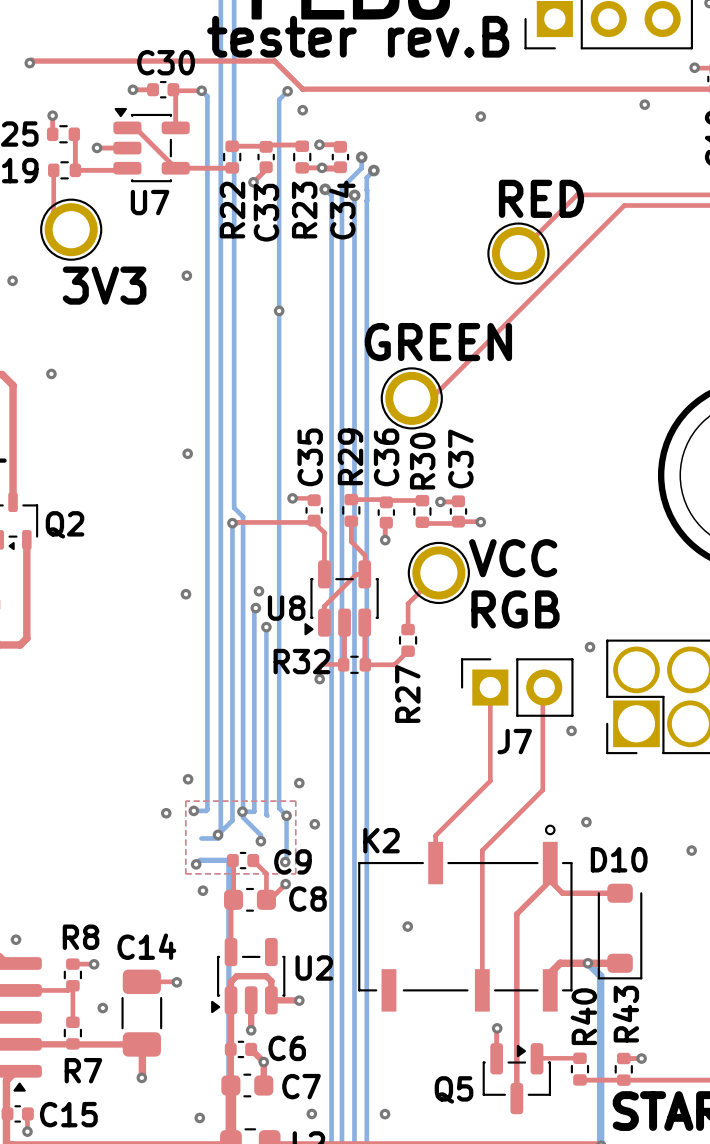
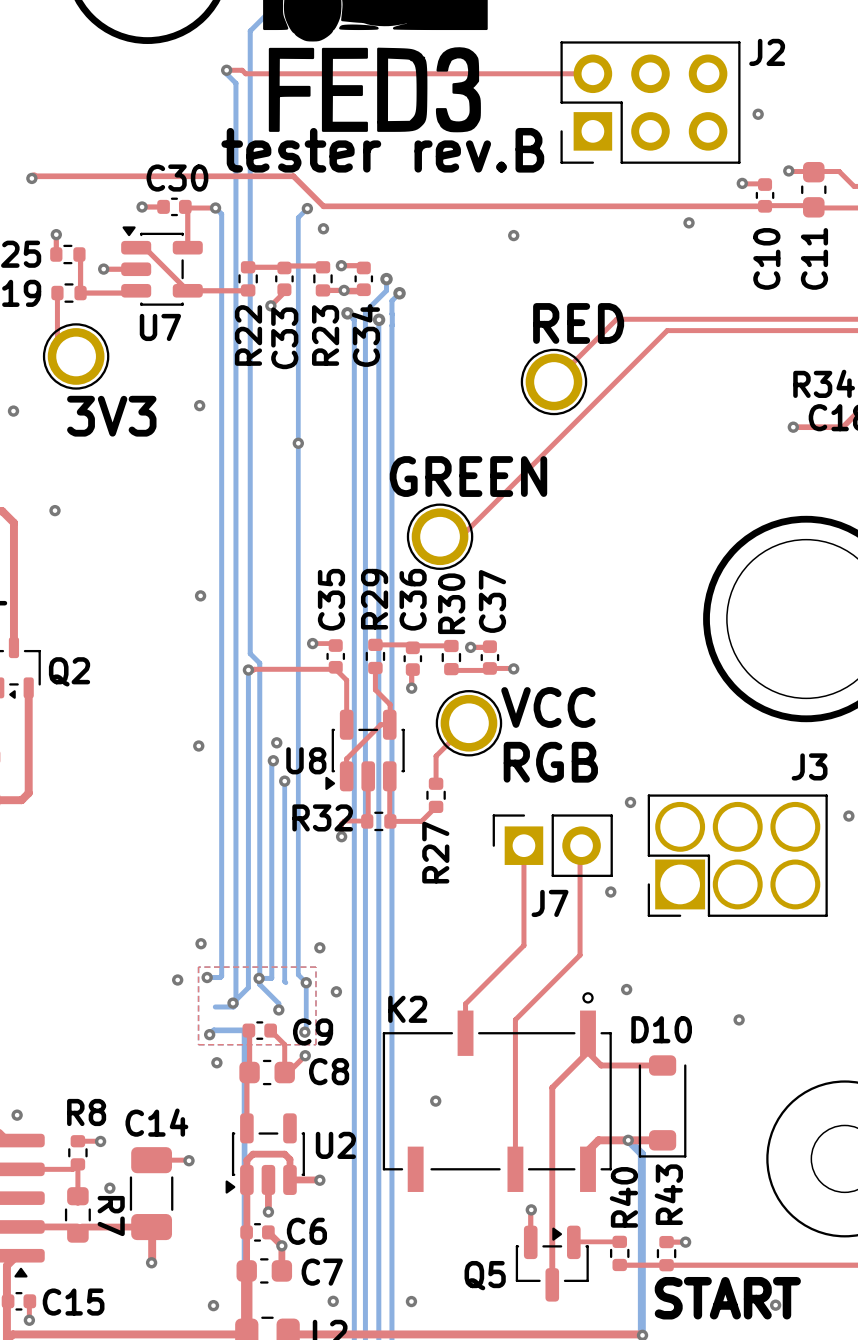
R7 footprint: [63, 1016, 83, 1050] -> [64, 1187, 91, 1243]
R7 name rotation: 0° (83, 1070) -> 90° clockwise (111, 1216)

